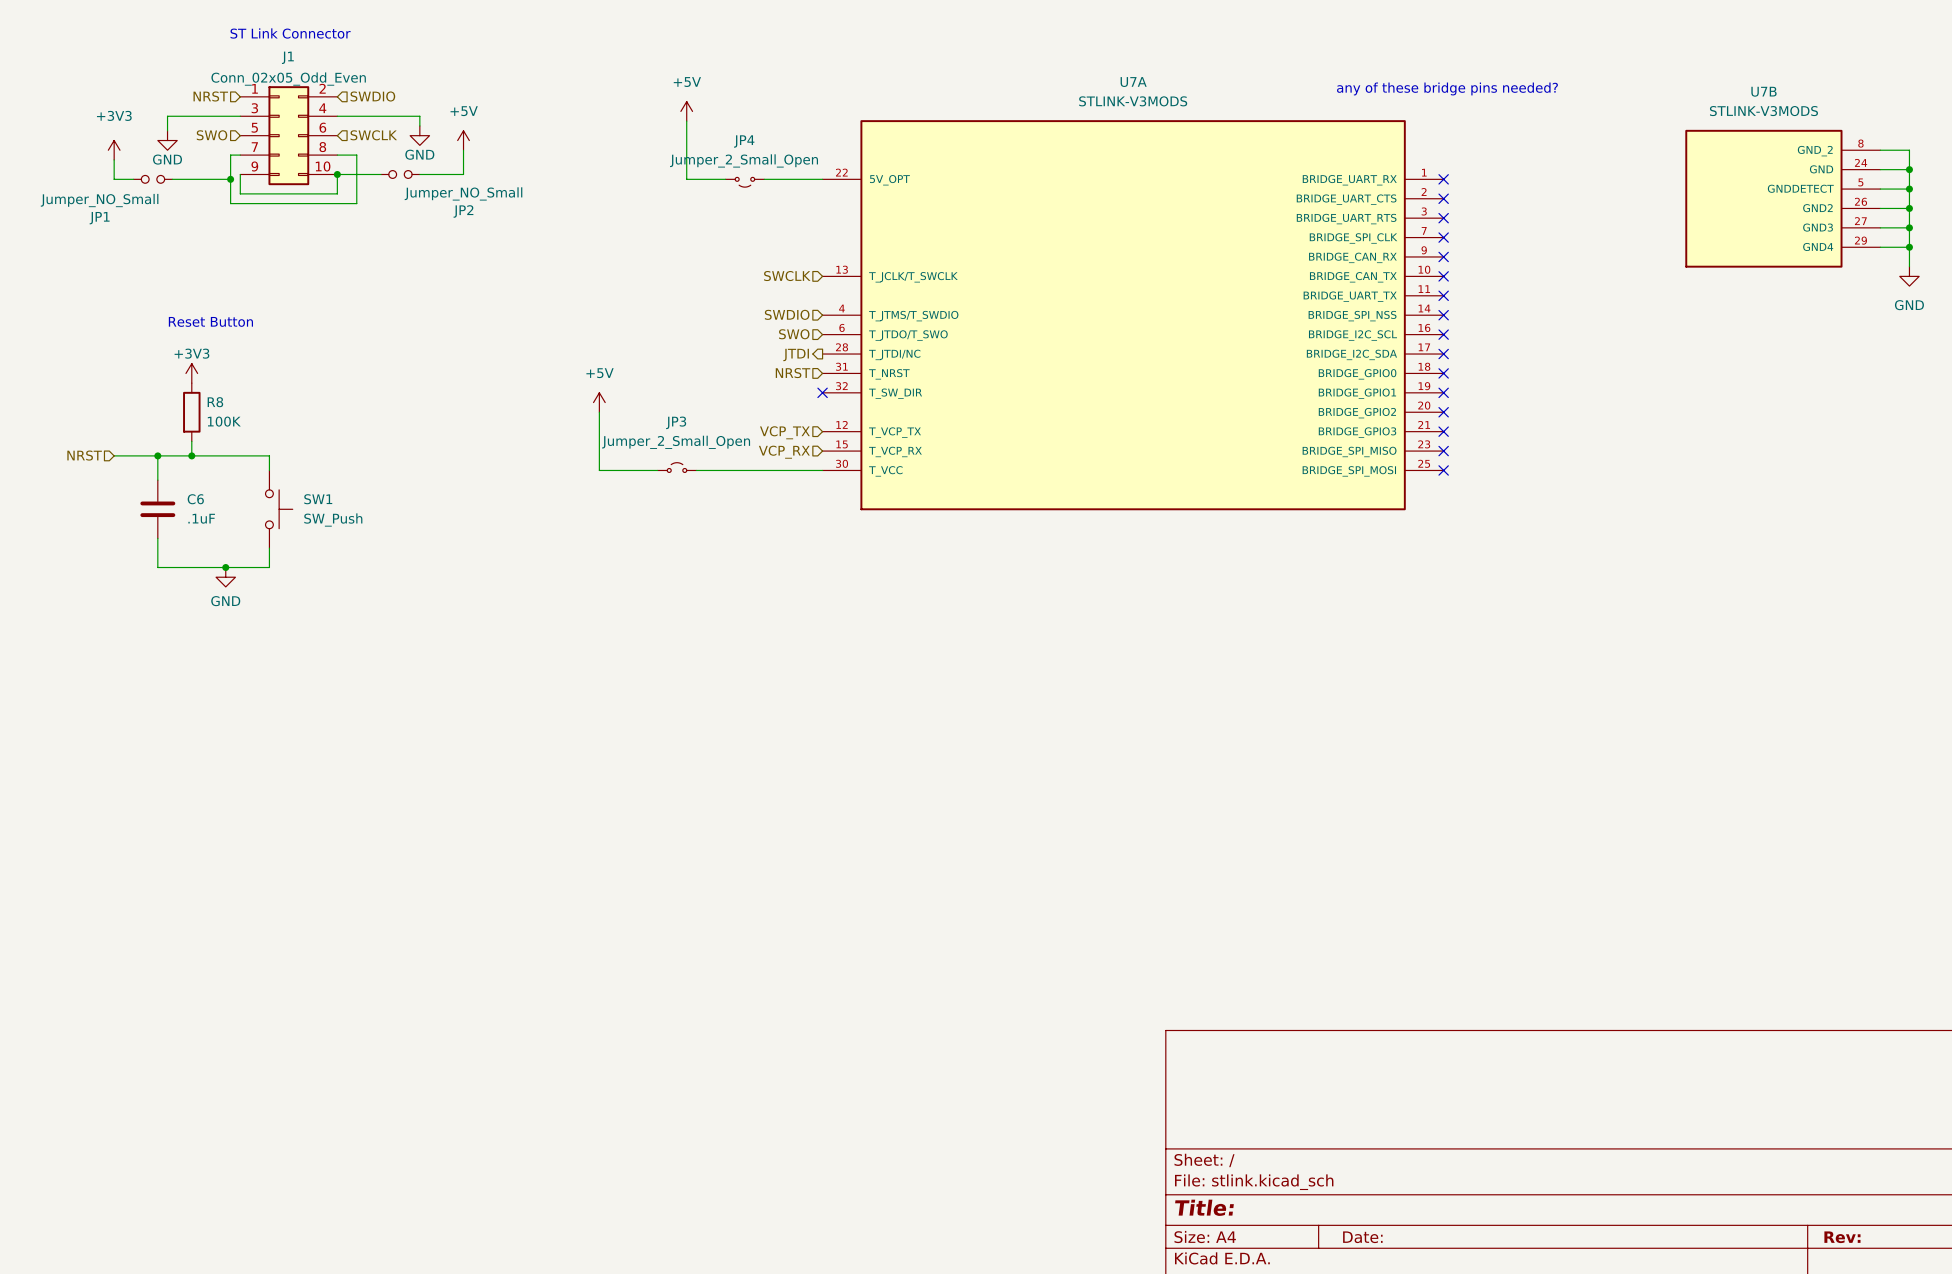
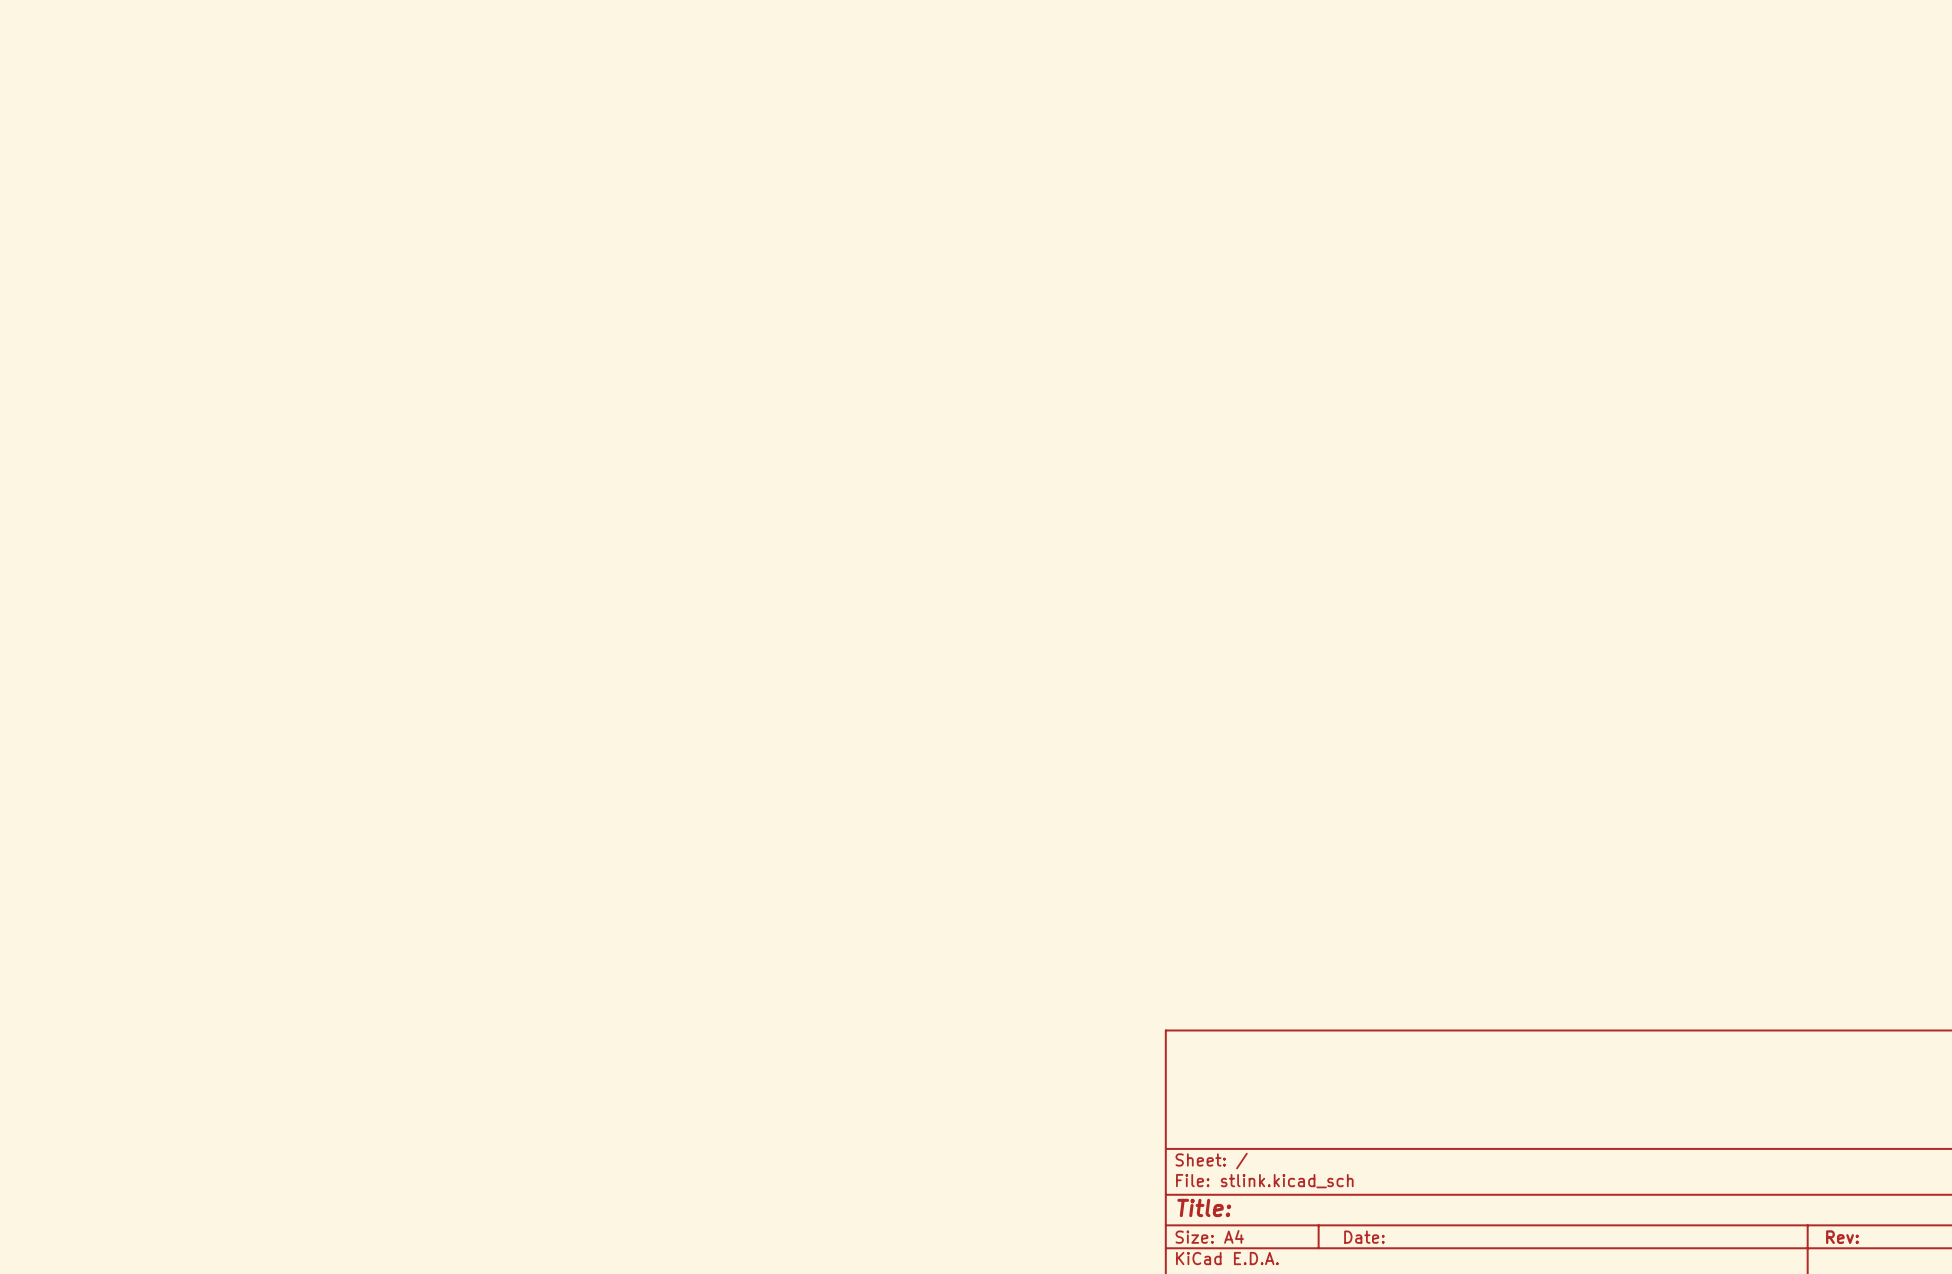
text: ST Link Connector (290, 33) -> none
text: any of these bridge pins needed? (1447, 88) -> none
hierarchical label: NRST (210, 96) -> none
hierarchical label: SWDIO (372, 96) -> none
power symbol: +5V (686, 111) -> none
wire: (240, 116) (167, 116) (167, 130) -> none
wire: (337, 116) (419, 116) (419, 125) -> none
wire: (686, 121) (686, 179) (725, 179) -> none
hierarchical label: SWO (212, 135) -> none
J1: Conn_02x05_Odd_Even (288, 135) -> none
hierarchical label: SWCLK (373, 135) -> none
power symbol: GND (419, 135) -> none
power symbol: GND (167, 140) -> none
power symbol: +5V (463, 140) -> none
power symbol: +3V3 (114, 150) -> none
wire: (463, 150) (463, 174) (419, 174) -> none
wire: (1880, 150) (1909, 150) (1909, 266) -> none
wire: (240, 155) (230, 155) (230, 203) (356, 203) (356, 155) (337, 155) -> none
wire: (114, 159) (114, 179) (133, 179) -> none
wire: (1880, 169) (1909, 169) -> none
junction: (1909, 169) -> none
wire: (240, 174) (240, 193) (337, 193) (337, 174) (381, 174) -> none
junction: (337, 174) -> none
JP2: Jumper_NO_Small (400, 174) -> none
JP1: Jumper_NO_Small (152, 179) -> none
wire: (172, 179) (230, 179) -> none
junction: (230, 179) -> none
wire: (764, 179) (822, 179) -> none
no-connect mark: (1443, 179) -> none
JP4: Jumper_2_Small_Open (744, 182) -> none
wire: (1880, 189) (1909, 189) -> none
junction: (1909, 189) -> none
no-connect mark: (1443, 198) -> none
U7B: STLINK-V3MODS (1782, 198) -> none
wire: (1880, 208) (1909, 208) -> none
junction: (1909, 208) -> none
no-connect mark: (1443, 218) -> none
wire: (1880, 227) (1909, 227) -> none
junction: (1909, 227) -> none
no-connect mark: (1443, 237) -> none
wire: (1880, 247) (1909, 247) -> none
junction: (1909, 247) -> none
no-connect mark: (1443, 256) -> none
hierarchical label: SWCLK (787, 276) -> none
no-connect mark: (1443, 276) -> none
power symbol: GND (1909, 276) -> none
no-connect mark: (1443, 295) -> none
hierarchical label: SWDIO (787, 314) -> none
U7A: STLINK-V3MODS (1133, 315) -> none
no-connect mark: (1443, 315) -> none
text: Reset Button (210, 321) -> none
hierarchical label: SWO (794, 334) -> none
no-connect mark: (1443, 334) -> none
hierarchical label: JTDI (796, 354) -> none
no-connect mark: (1443, 354) -> none
power symbol: +3V3 (191, 373) -> none
hierarchical label: NRST (793, 373) -> none
no-connect mark: (1443, 373) -> none
no-connect mark: (822, 392) -> none
no-connect mark: (1443, 392) -> none
power symbol: +5V (599, 402) -> none
R8: 100K (191, 412) -> none
wire: (599, 412) (599, 470) (657, 470) -> none
no-connect mark: (1443, 412) -> none
no-connect mark: (1443, 431) -> none
hierarchical label: VCP_TX (784, 432) -> none
wire: (191, 441) (191, 455) -> none
no-connect mark: (1443, 451) -> none
hierarchical label: VCP_RX (784, 452) -> none
hierarchical label: NRST (84, 455) -> none
wire: (114, 455) (269, 455) (269, 470) -> none
wire: (157, 455) (157, 480) -> none
junction: (157, 455) -> none
junction: (191, 455) -> none
JP3: Jumper_2_Small_Open (677, 467) -> none
wire: (696, 470) (822, 470) -> none
no-connect mark: (1443, 470) -> none
C6: .1uF (157, 509) -> none
SW1: SW_Push (279, 509) -> none
wire: (157, 538) (157, 567) (269, 567) (269, 548) -> none
junction: (225, 567) -> none
power symbol: GND (225, 577) -> none

